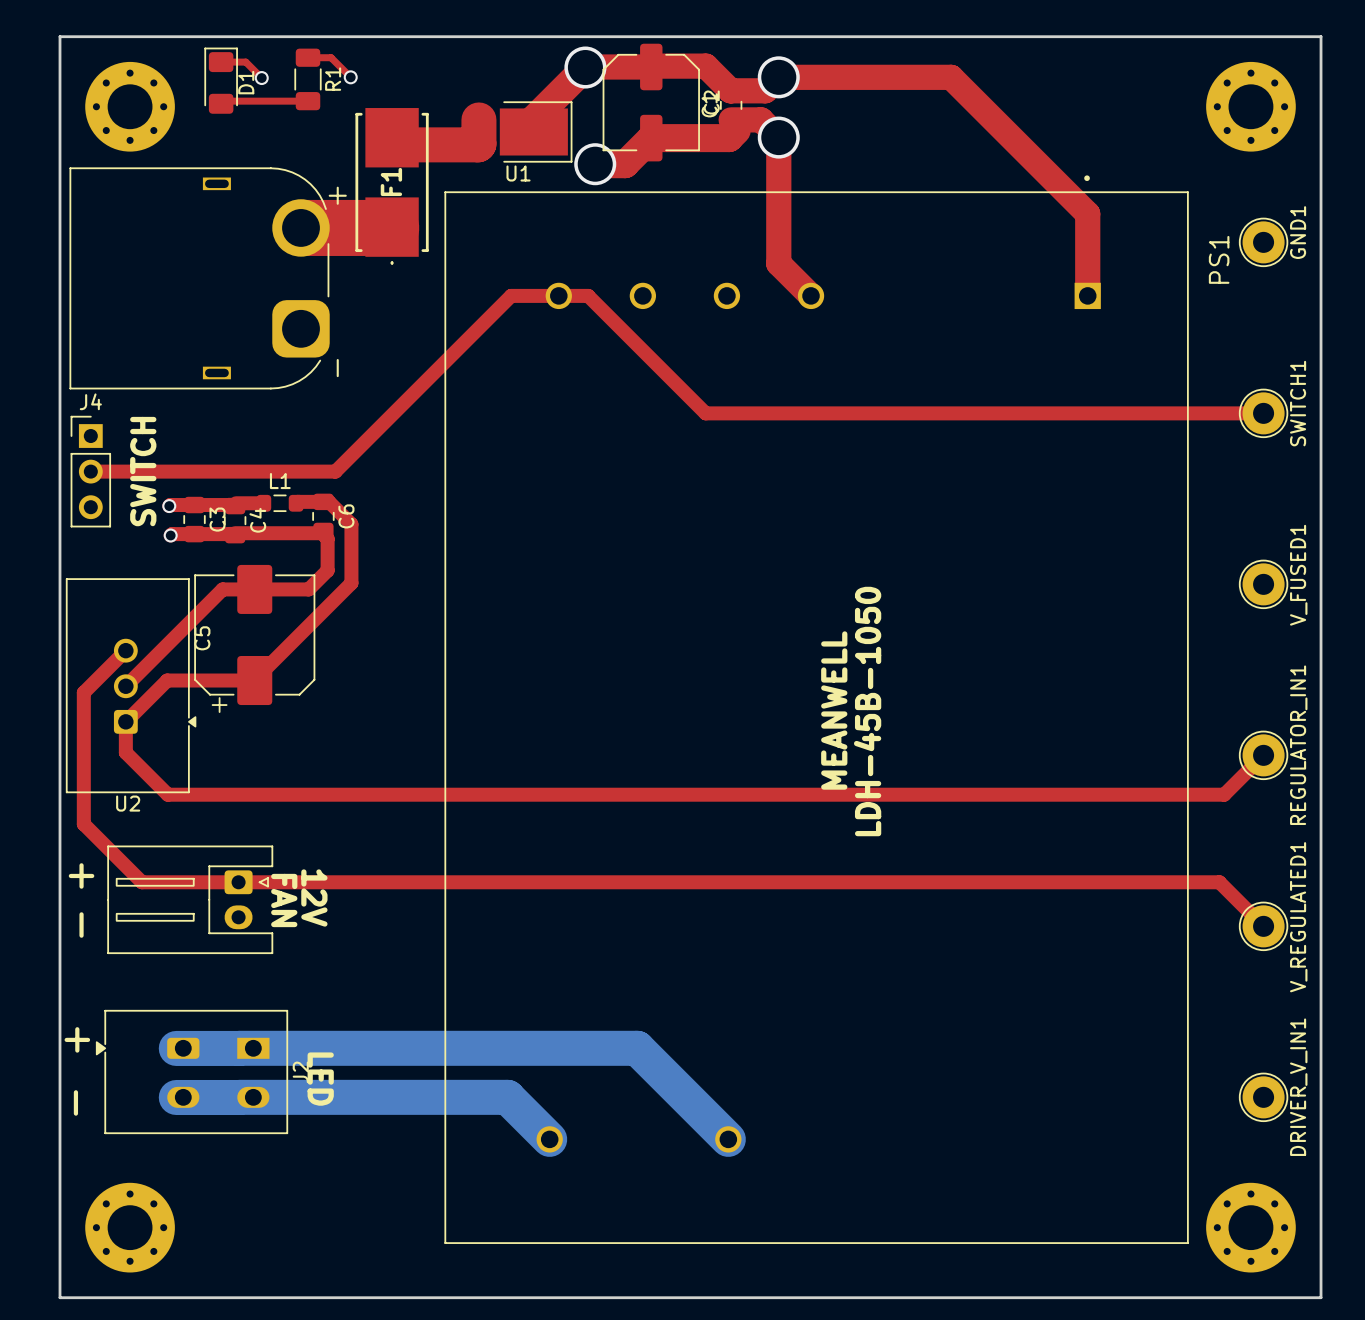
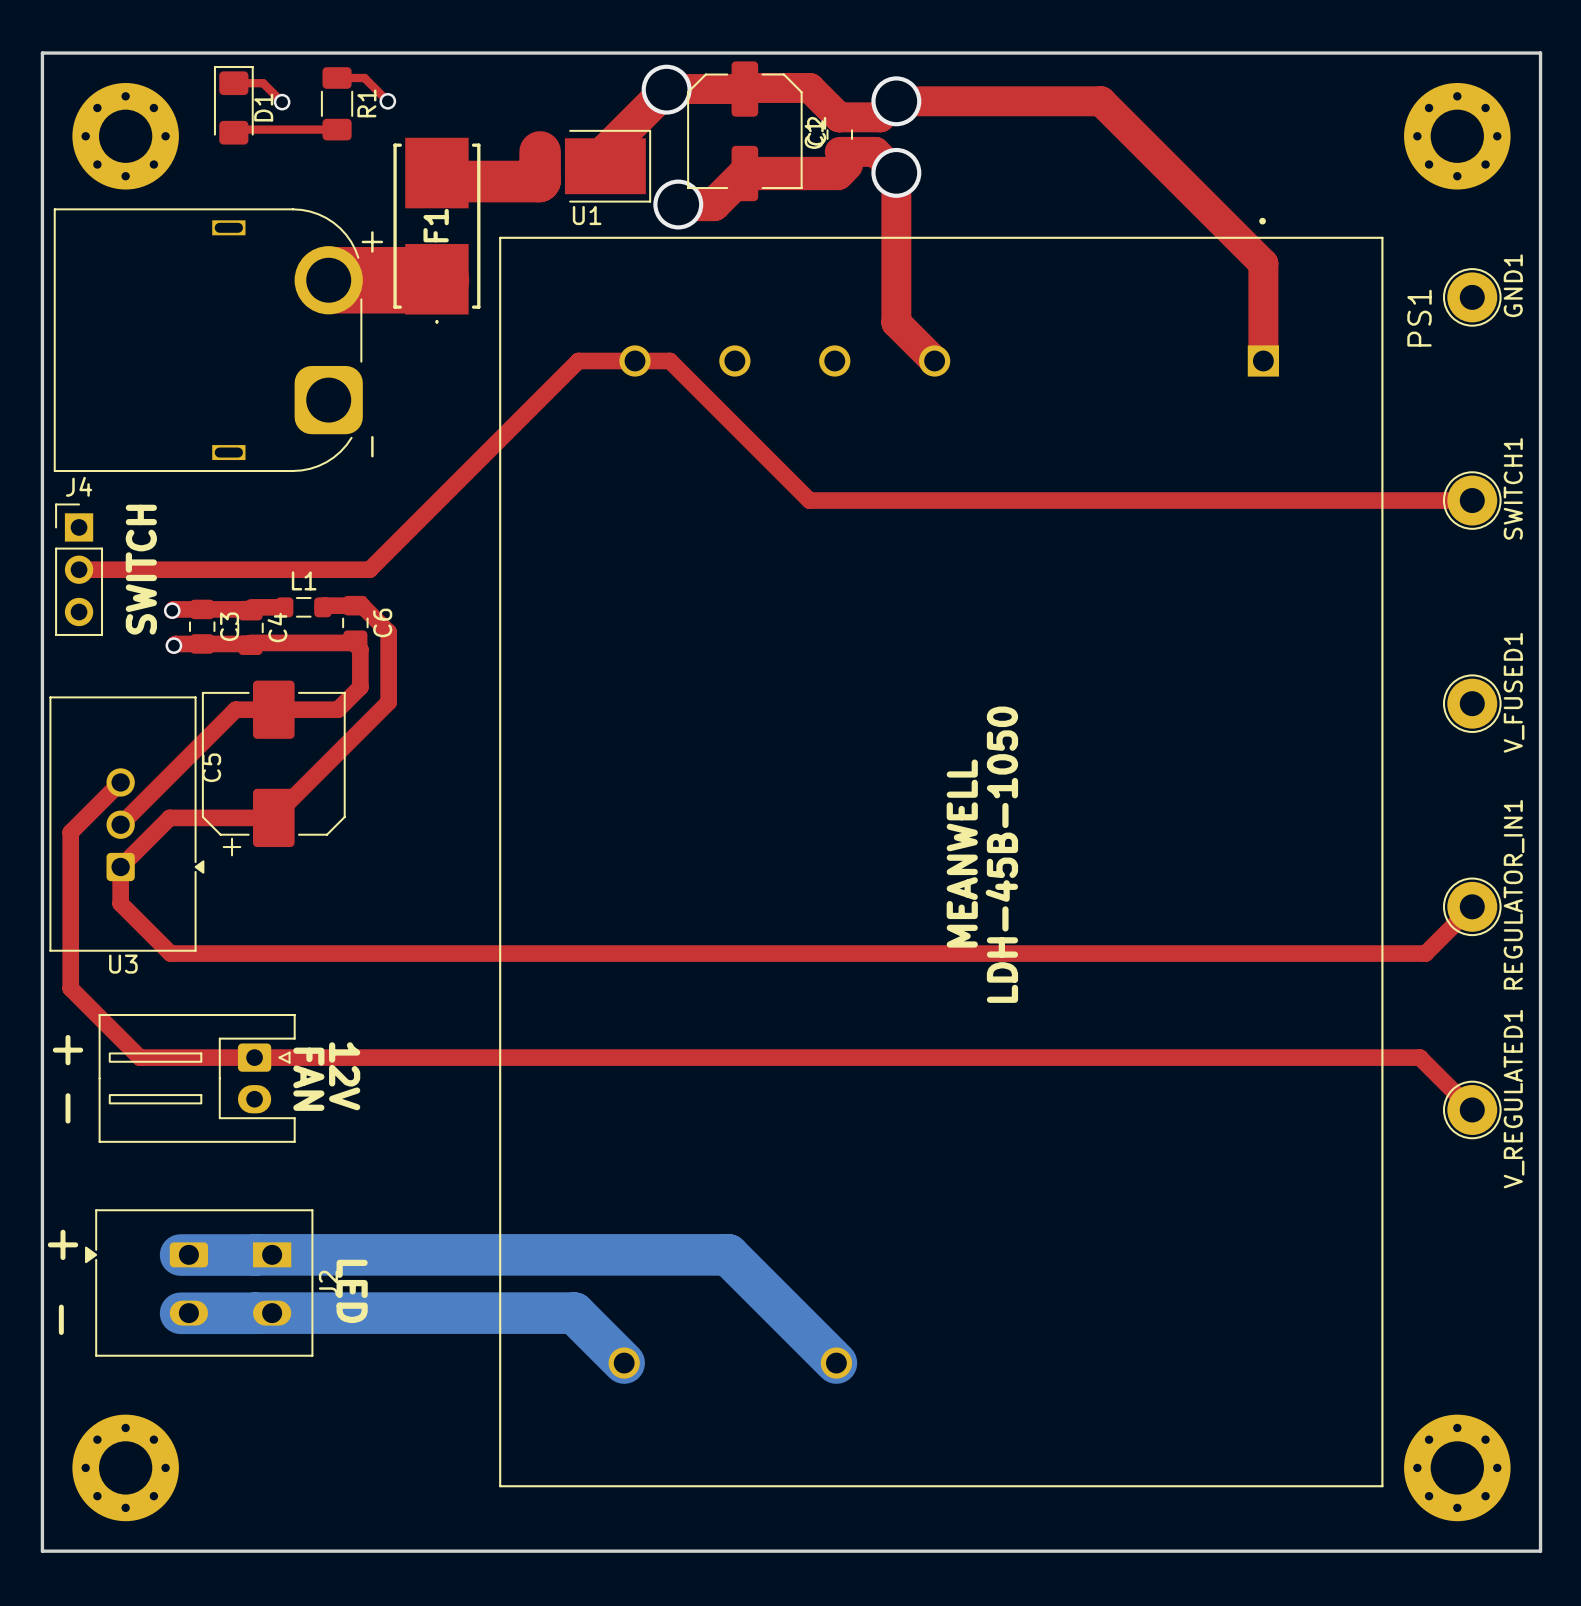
U2 name: U2 (128, 803) -> U3 (123, 964)
DRIVER_V_IN1: (1263, 1097) -> none

